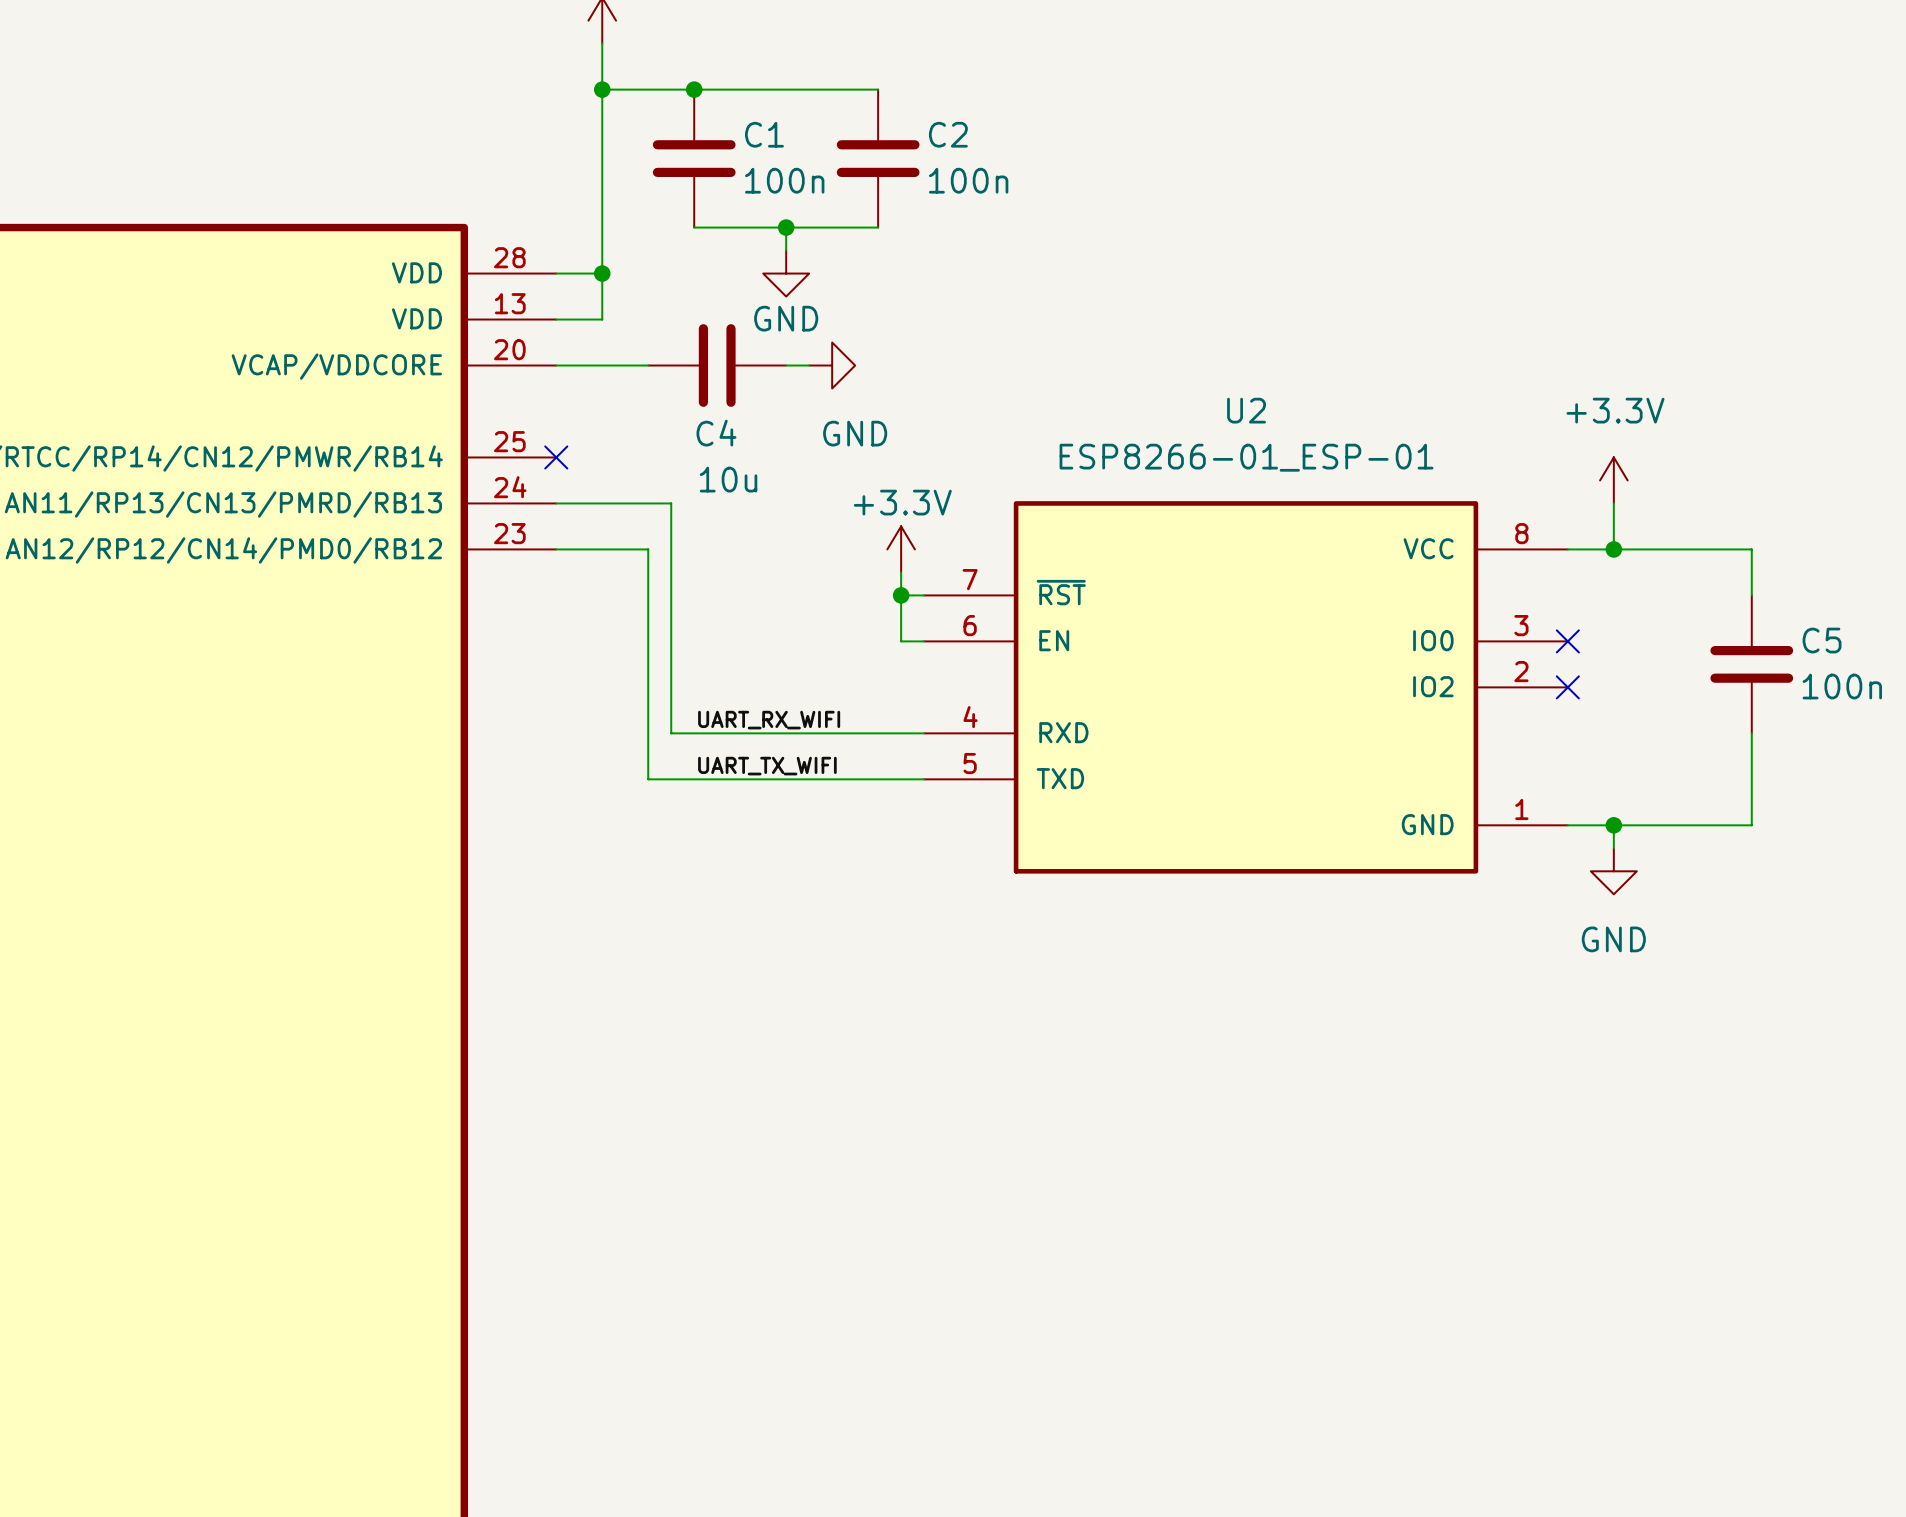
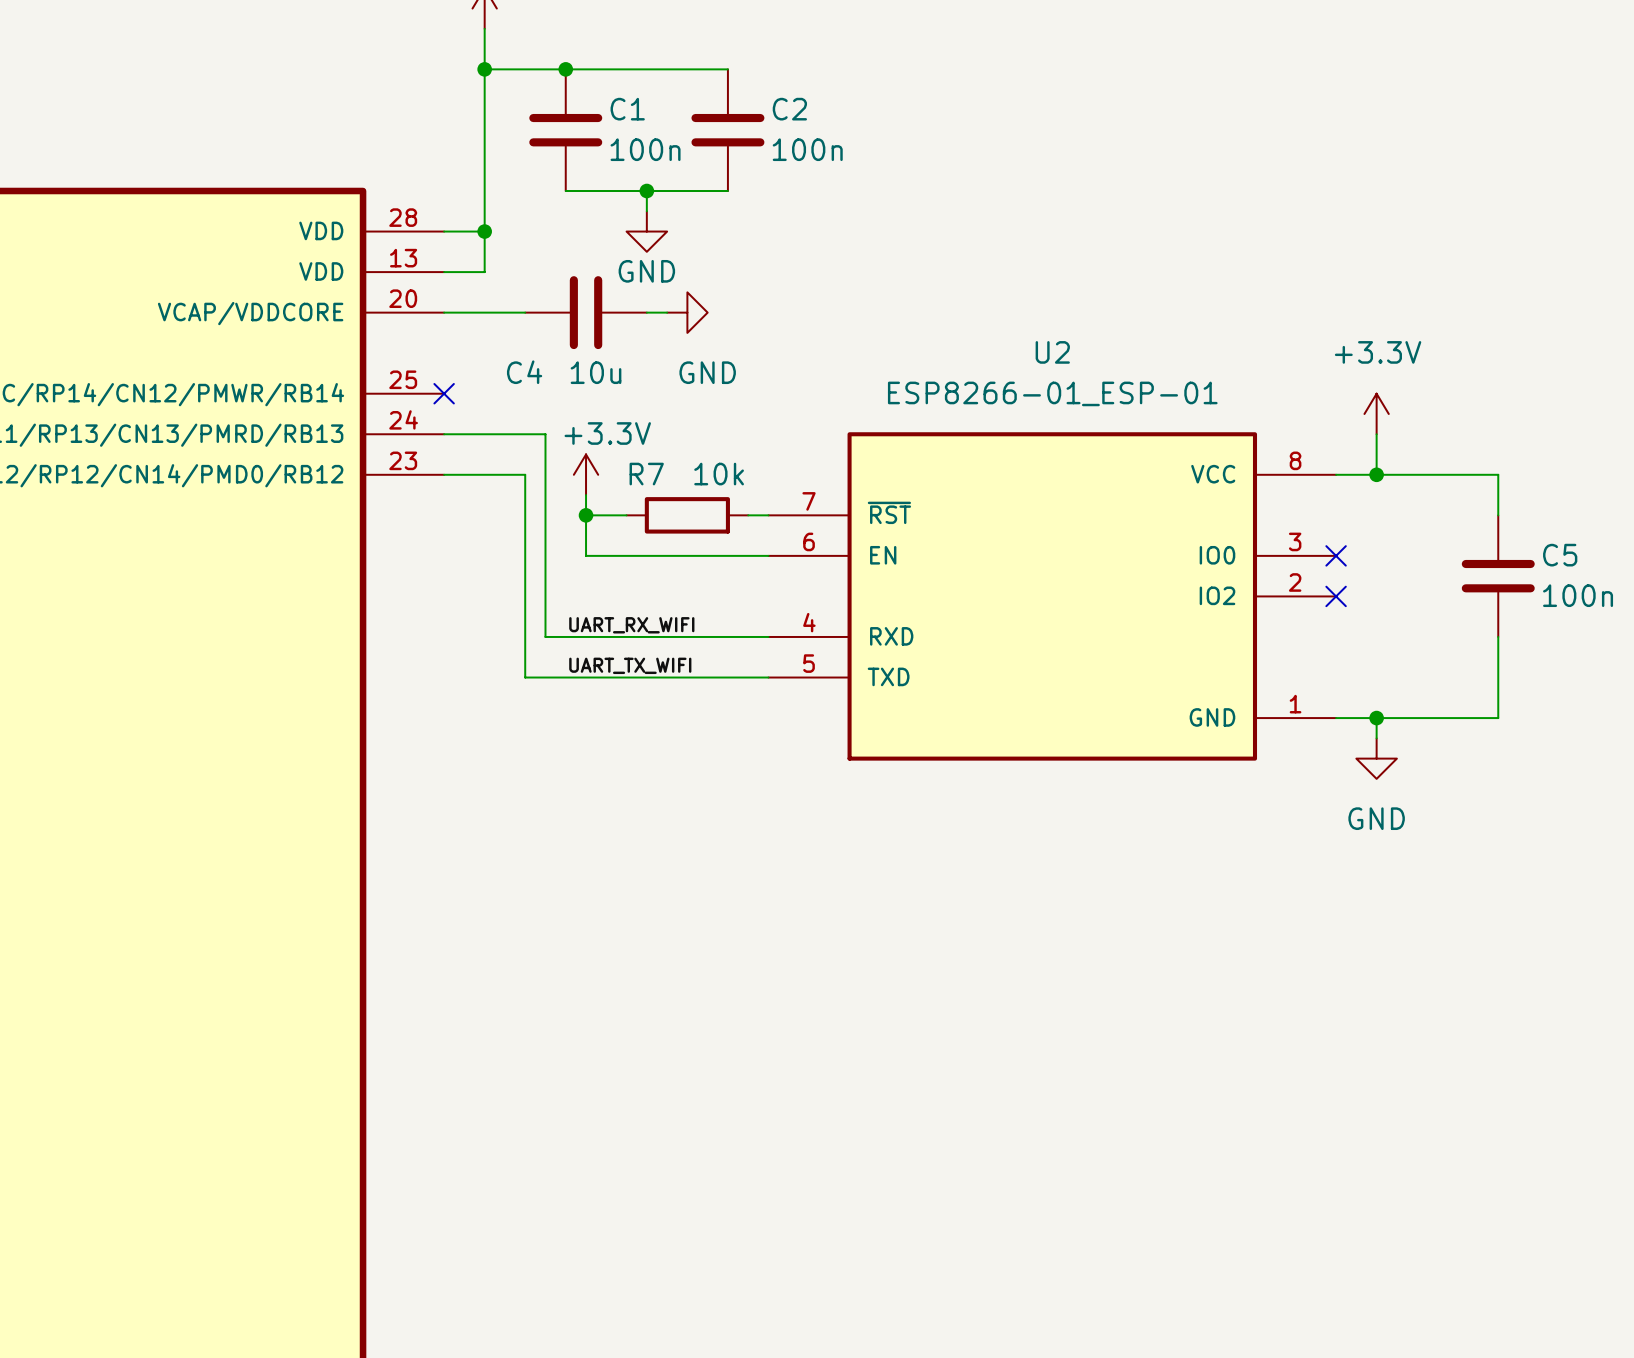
C4 name position: C4 (716, 433) -> C4 (524, 372)
C4 value position: 10u (728, 479) -> 10u (596, 372)
power symbol text position: +3.3V (902, 502) -> +3.3V (607, 433)
power symbol position: +3.3V (901, 549) -> +3.3V (586, 474)
wire: (901, 572) (901, 641) -> (586, 495) (586, 555) (748, 555)
wire: none -> (586, 515) (626, 515)
junction: none -> (586, 515)
R7: none -> 10k (687, 515)
junction: (901, 595) -> none

